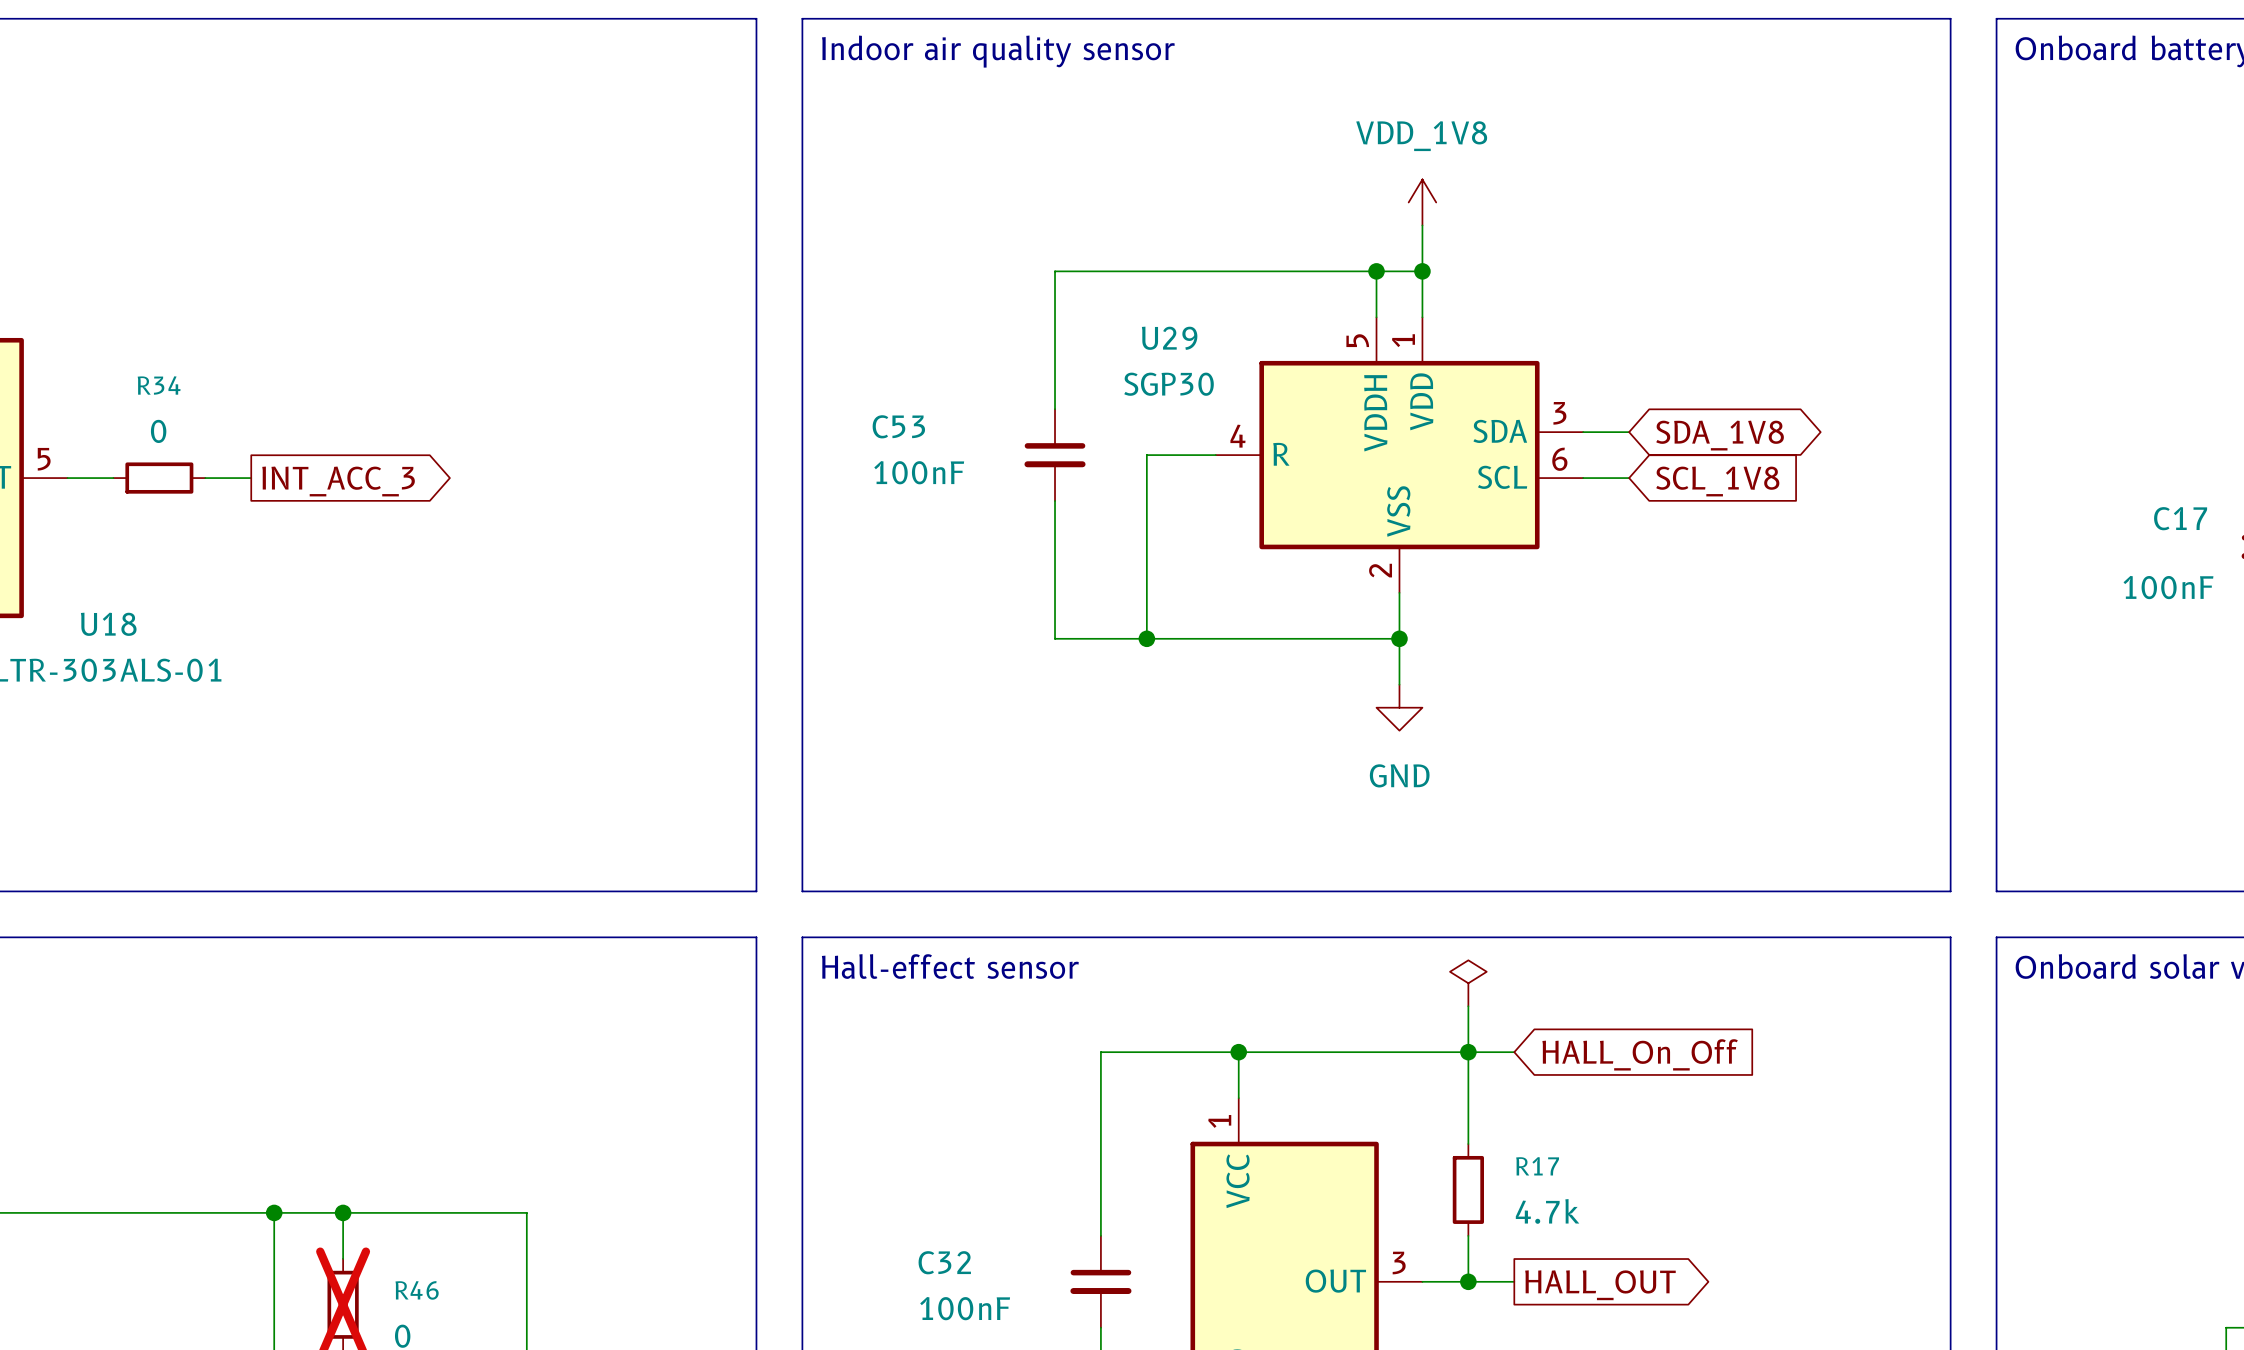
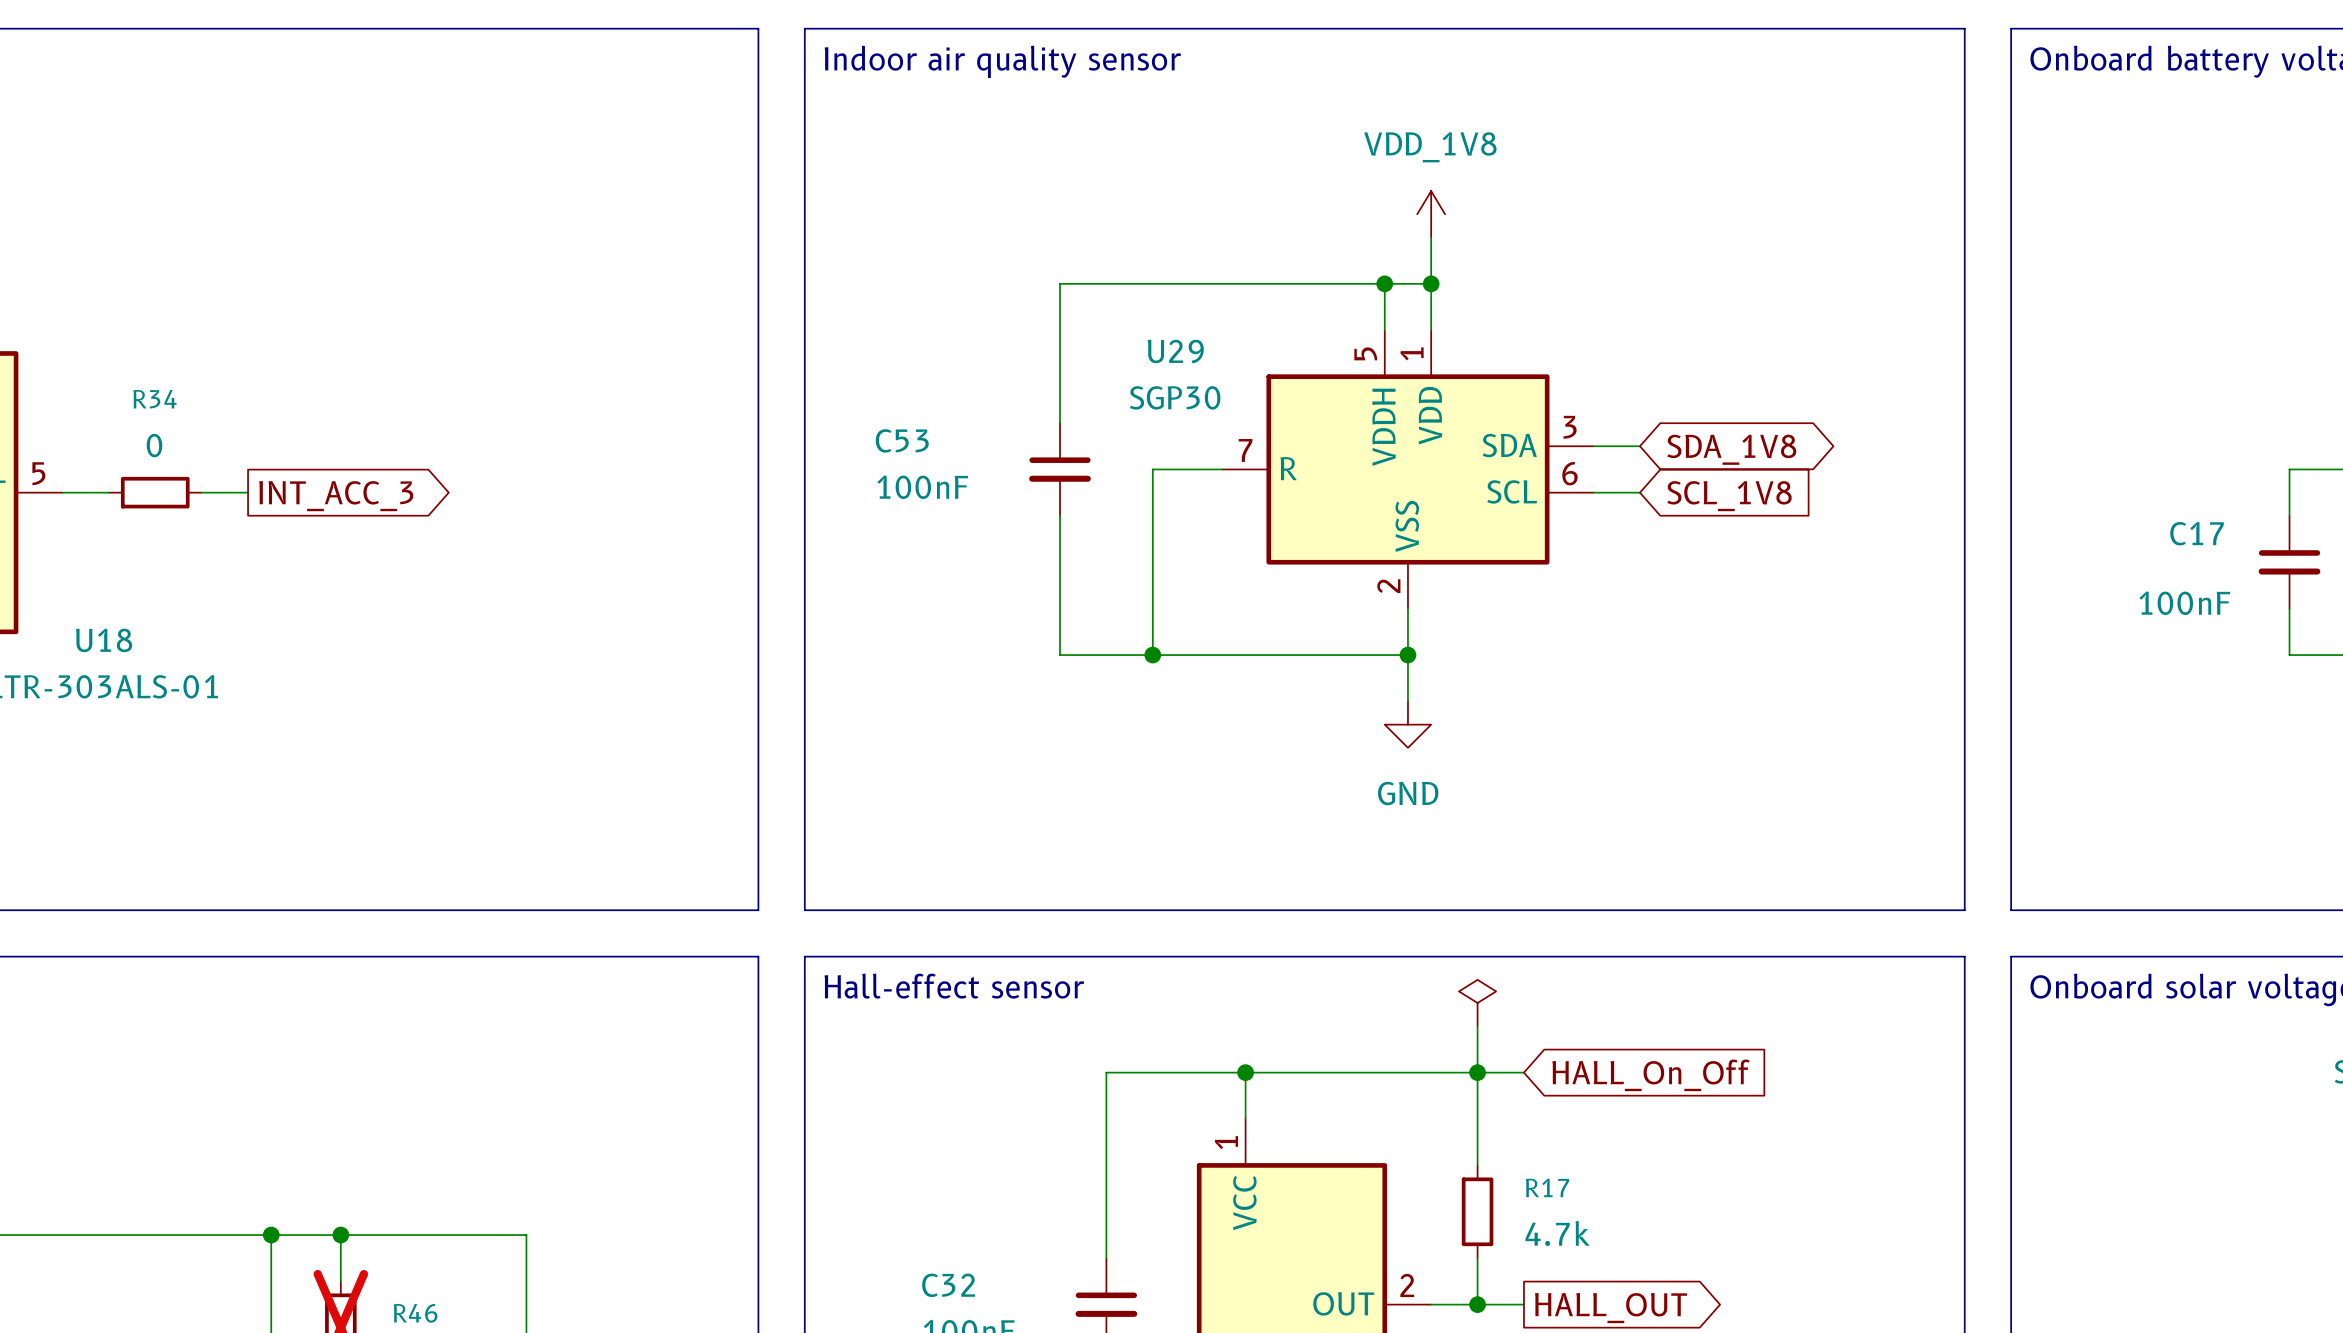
U29 pin number: 4 (1237, 436) -> 7 (1245, 450)
part pin number: 3 (1399, 1263) -> 2 (1407, 1285)

